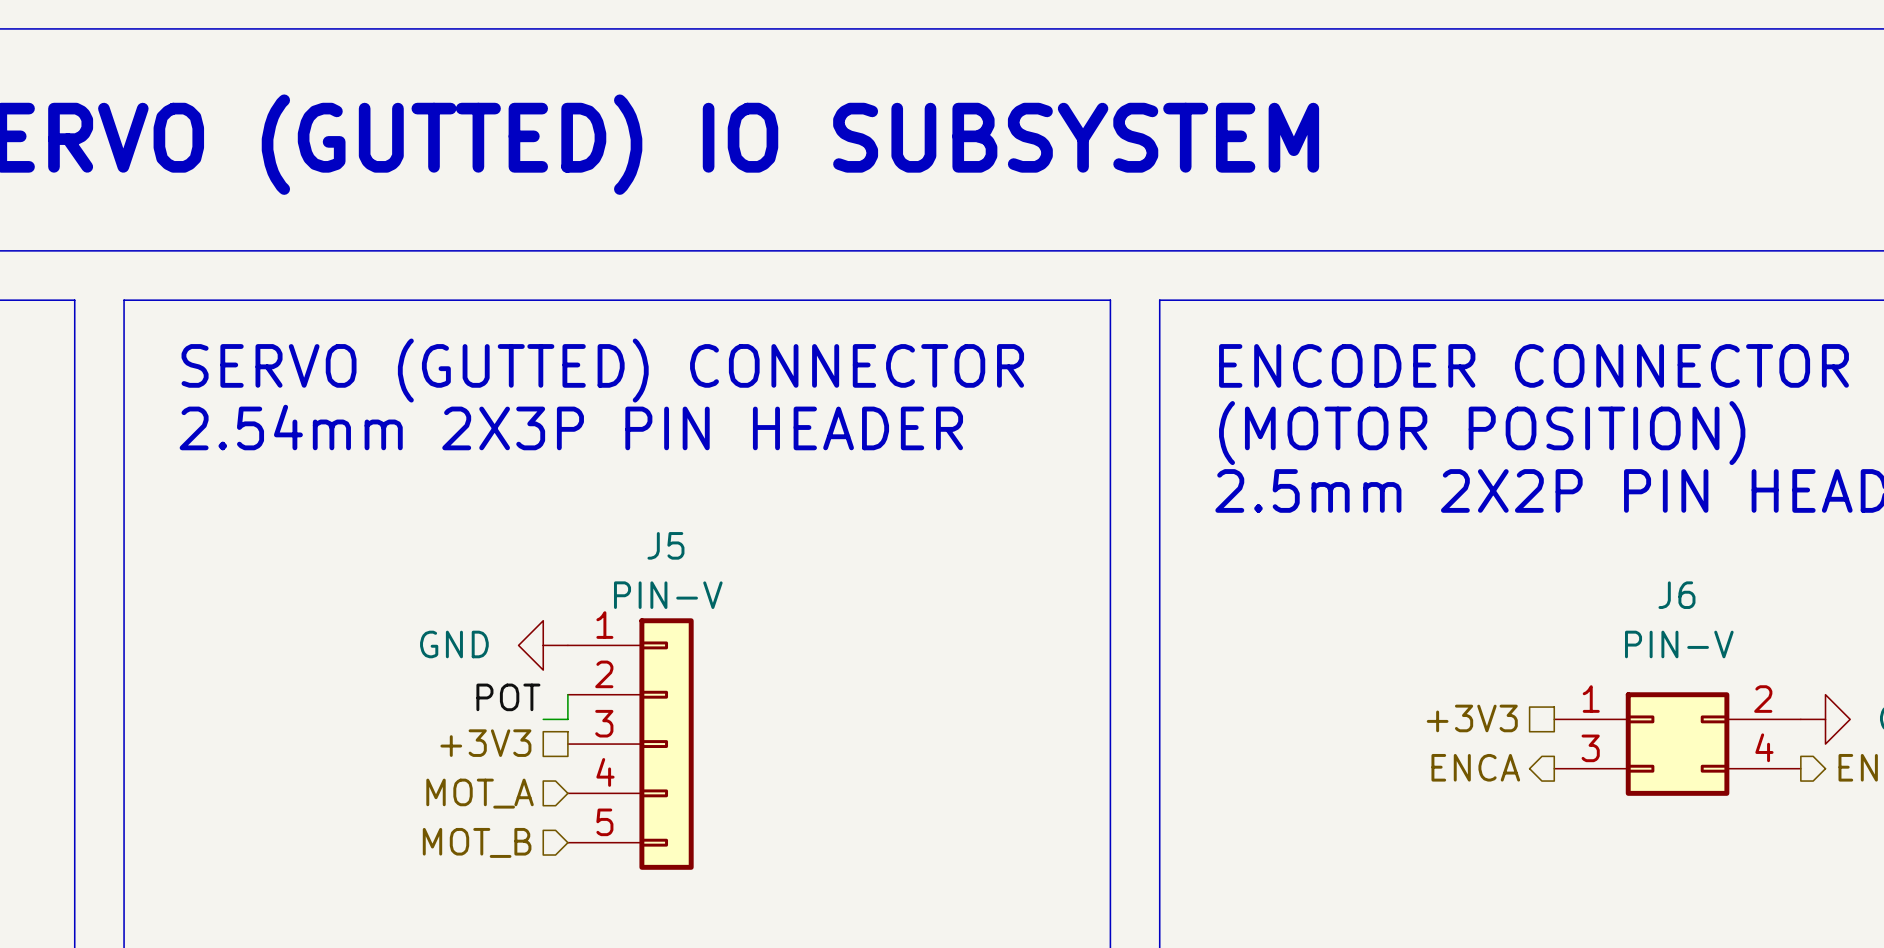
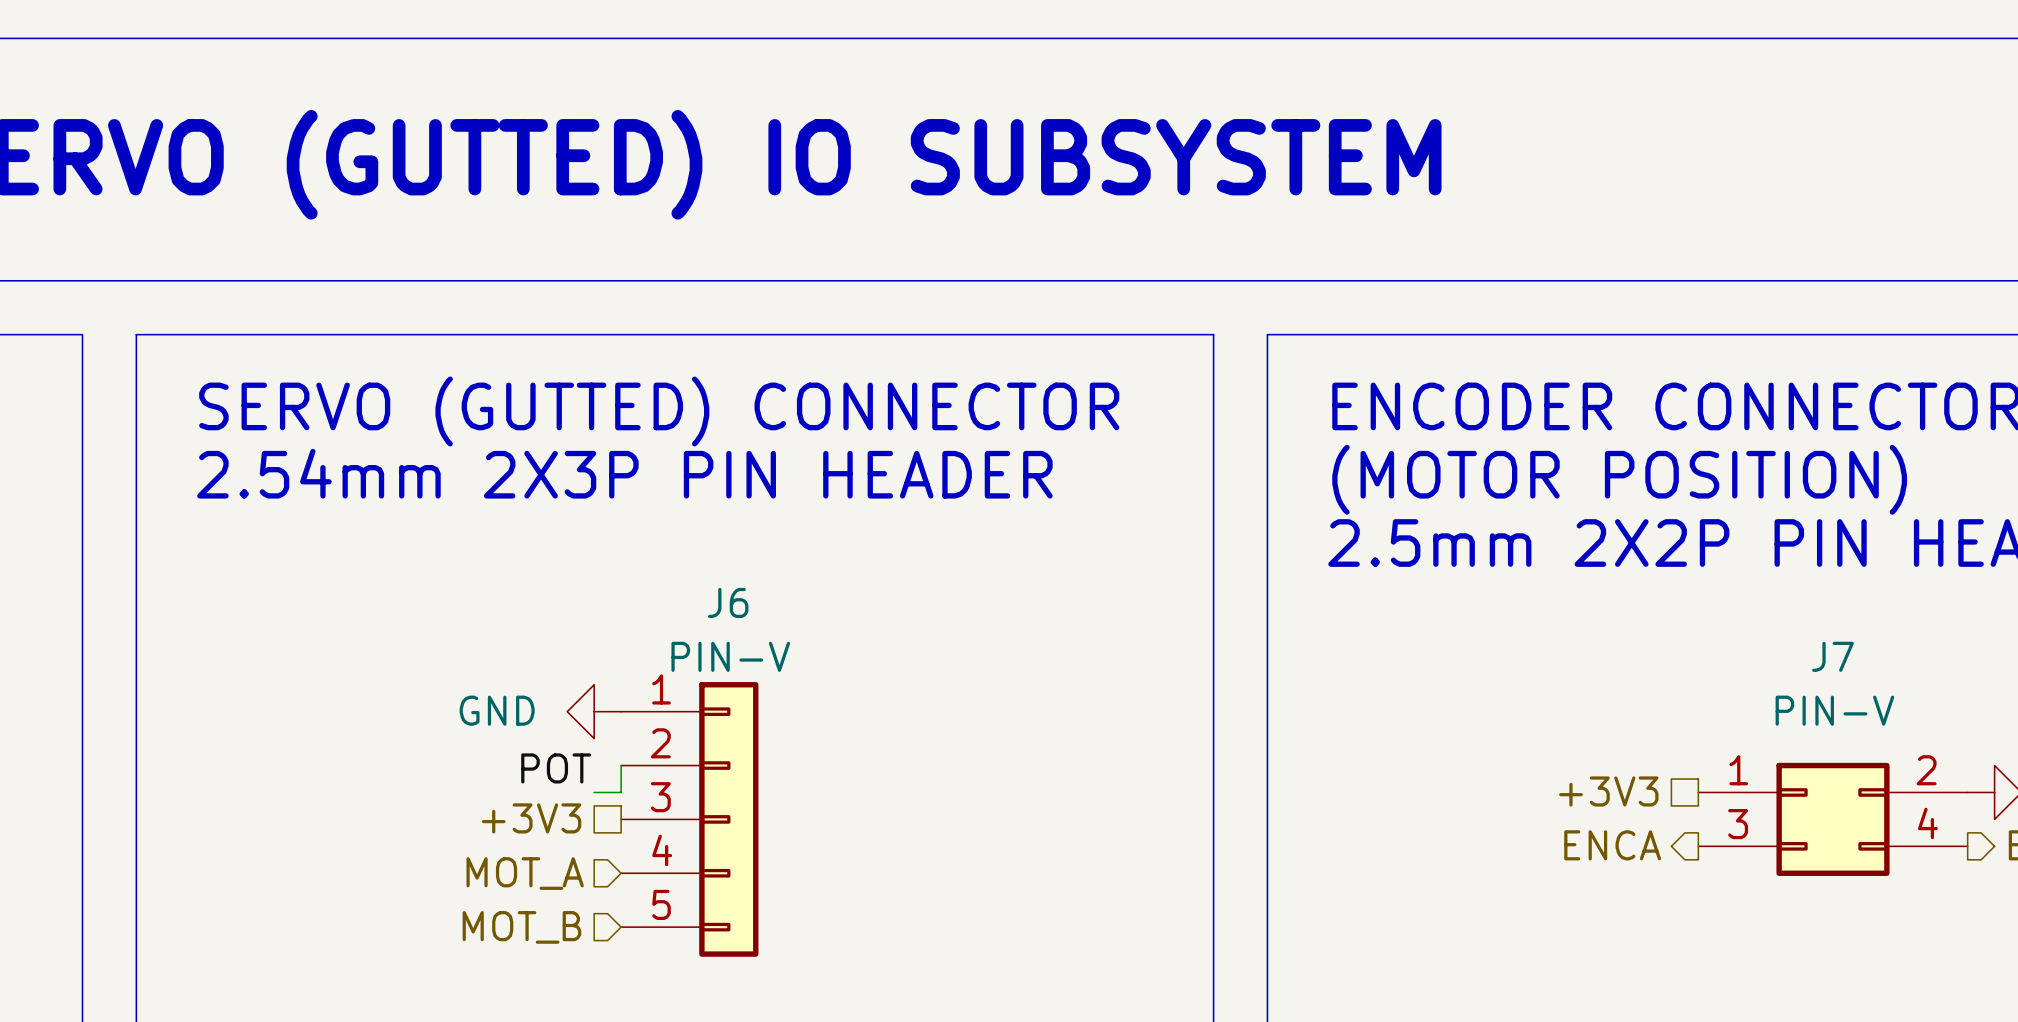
J5 name: J5 (665, 545) -> J6 (728, 602)
J6 name: J6 (1676, 595) -> J7 (1833, 656)

